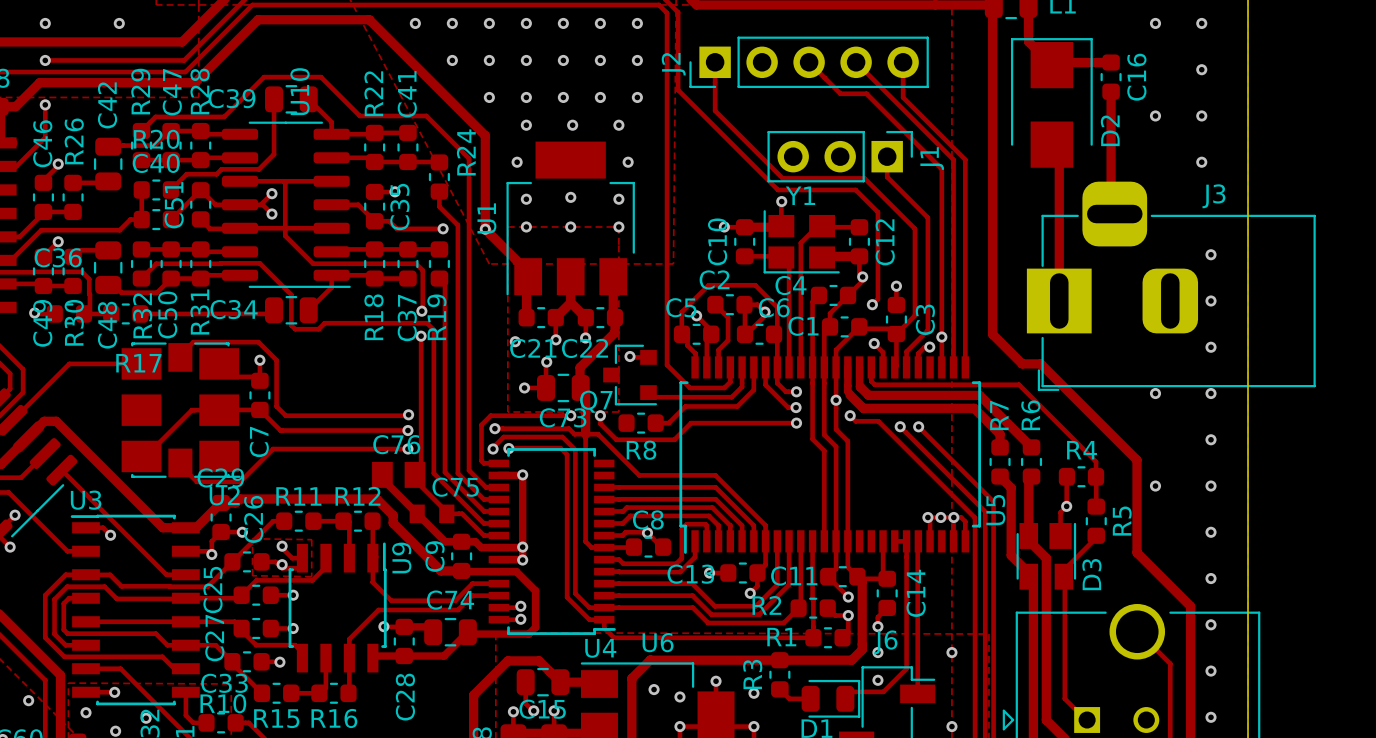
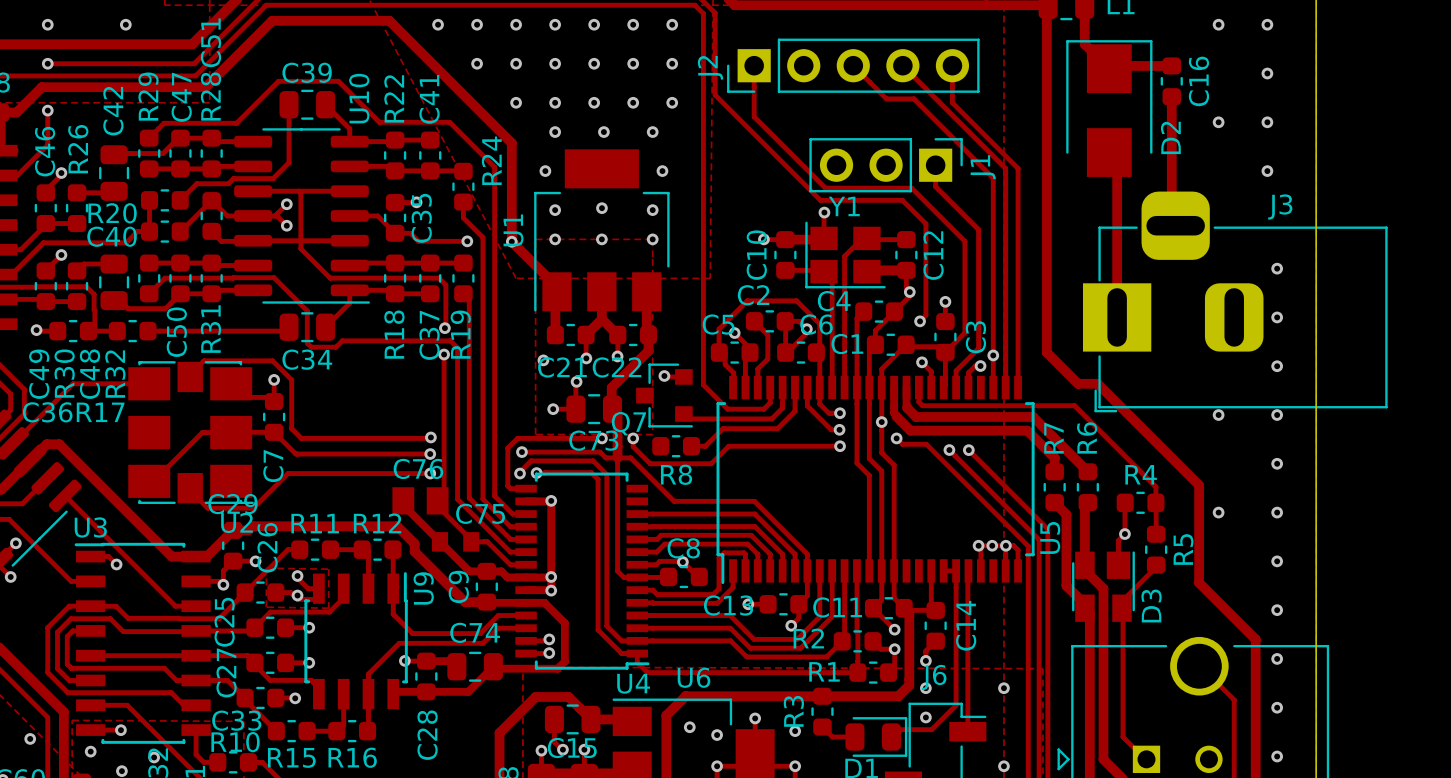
U10 name position: U10 (299, 91) -> U10 (359, 98)
C39 name position: C39 (231, 98) -> C39 (307, 72)
R20 name position: R20 (156, 139) -> R20 (112, 213)
C40 name position: C40 (156, 163) -> C40 (112, 236)
C51 name position: C51 (174, 205) -> C51 (210, 42)
C36 name position: C36 (58, 257) -> C36 (47, 412)
C34 name position: C34 (234, 309) -> C34 (307, 359)
R32 name position: R32 (142, 315) -> R32 (115, 374)
R30 name position: R30 (74, 322) -> R30 (64, 373)
C49 name position: C49 (42, 323) -> C49 (39, 374)
C48 name position: C48 (107, 325) -> C48 (89, 374)
R17 name position: R17 (138, 363) -> R17 (100, 412)

